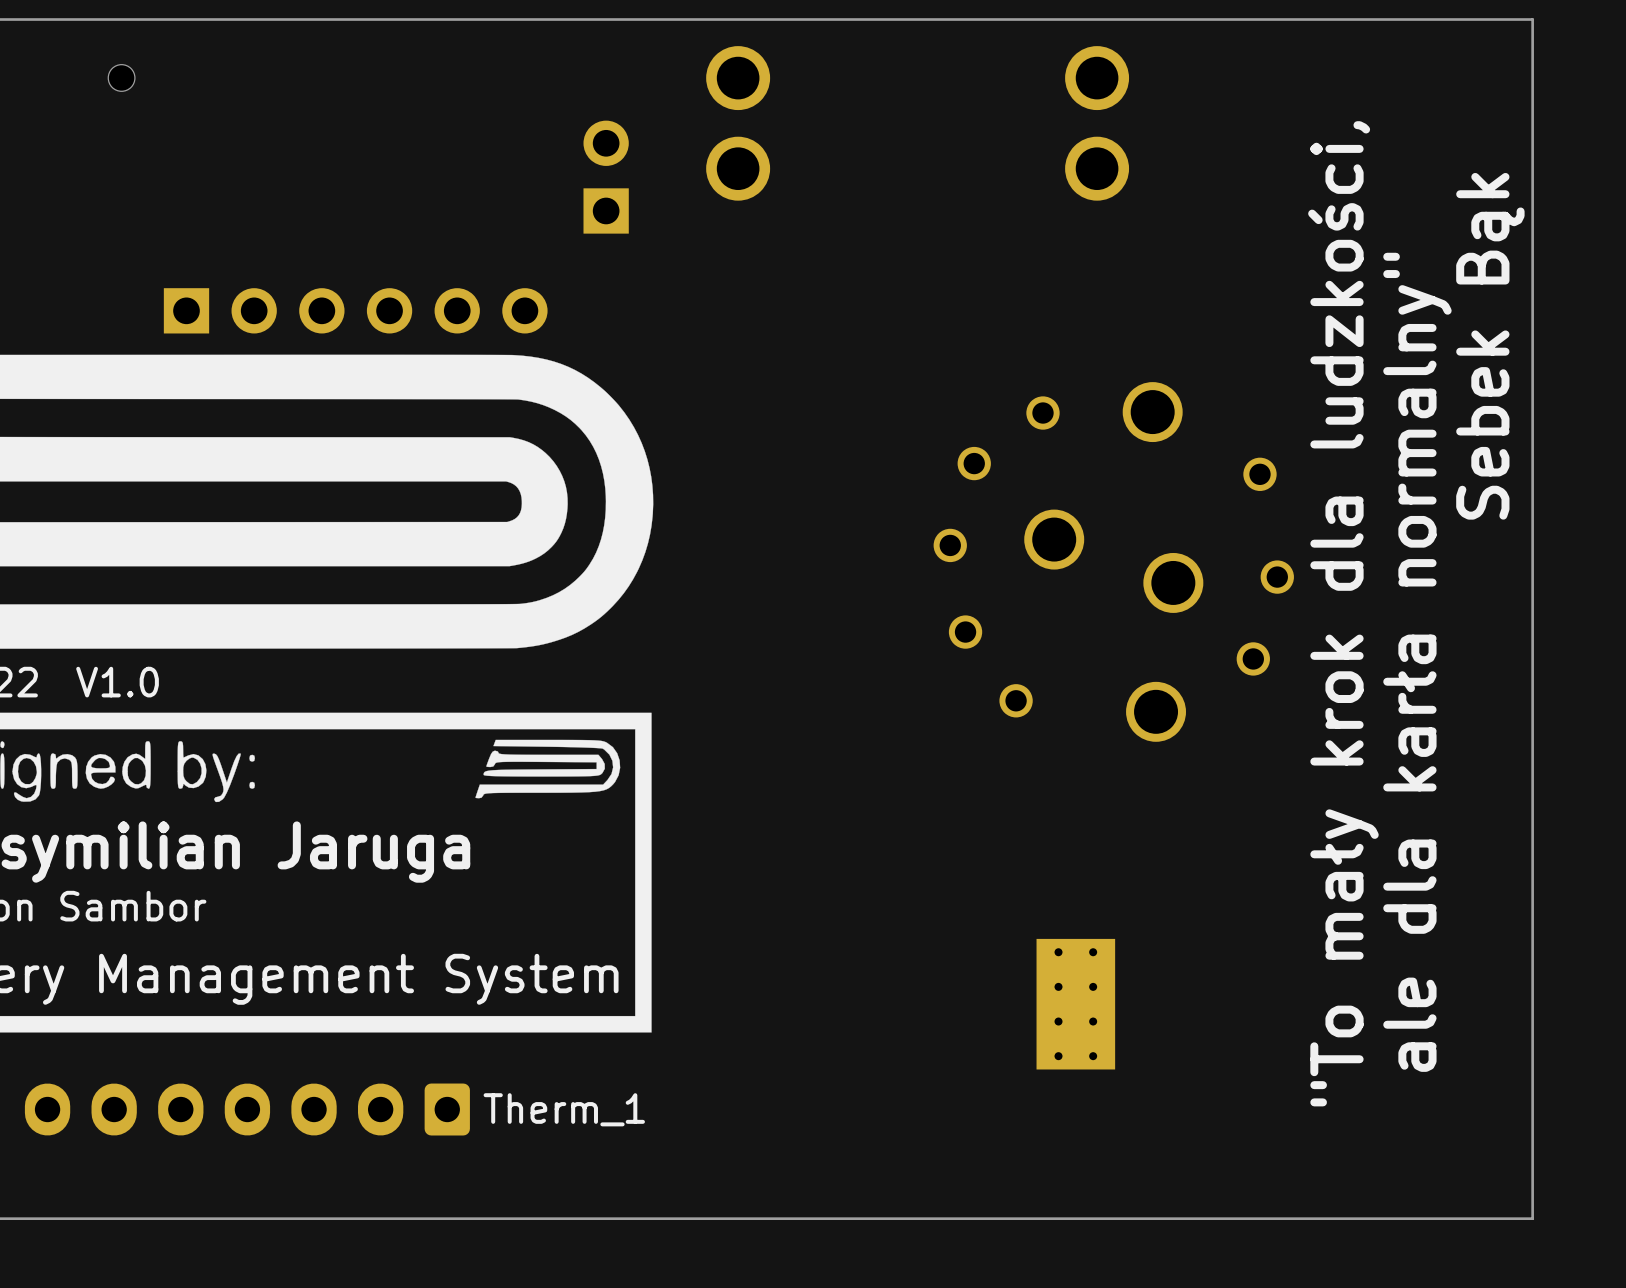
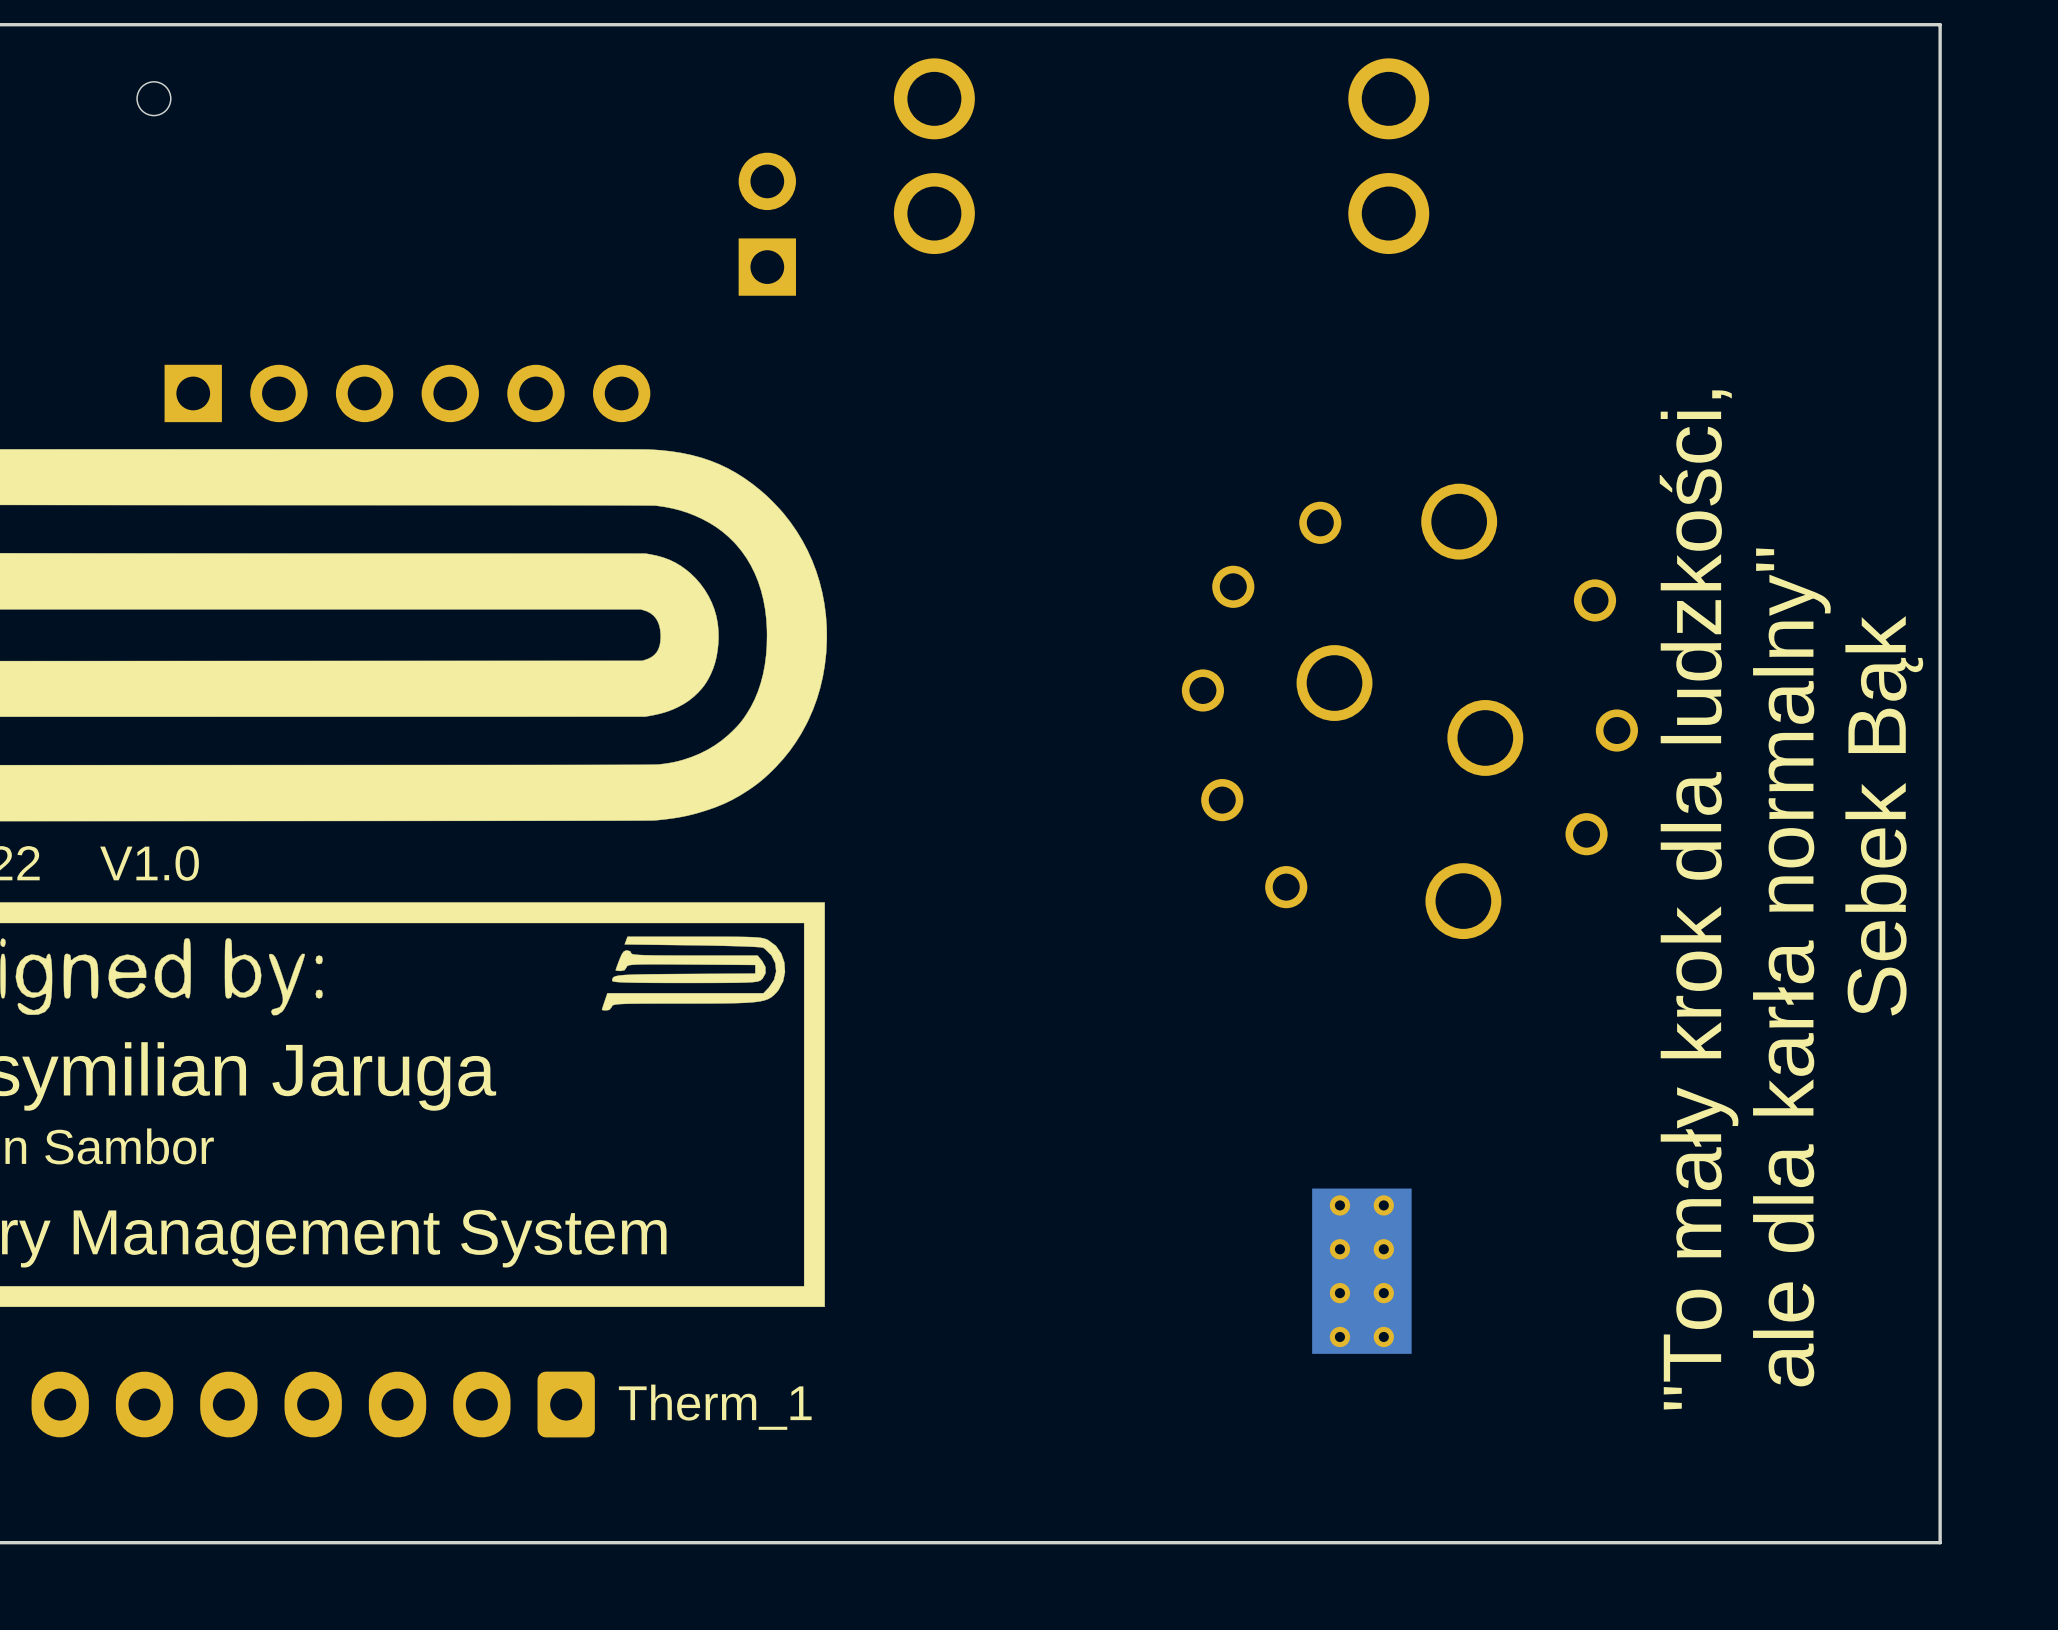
part position: (355, 310) -> (407, 393)

